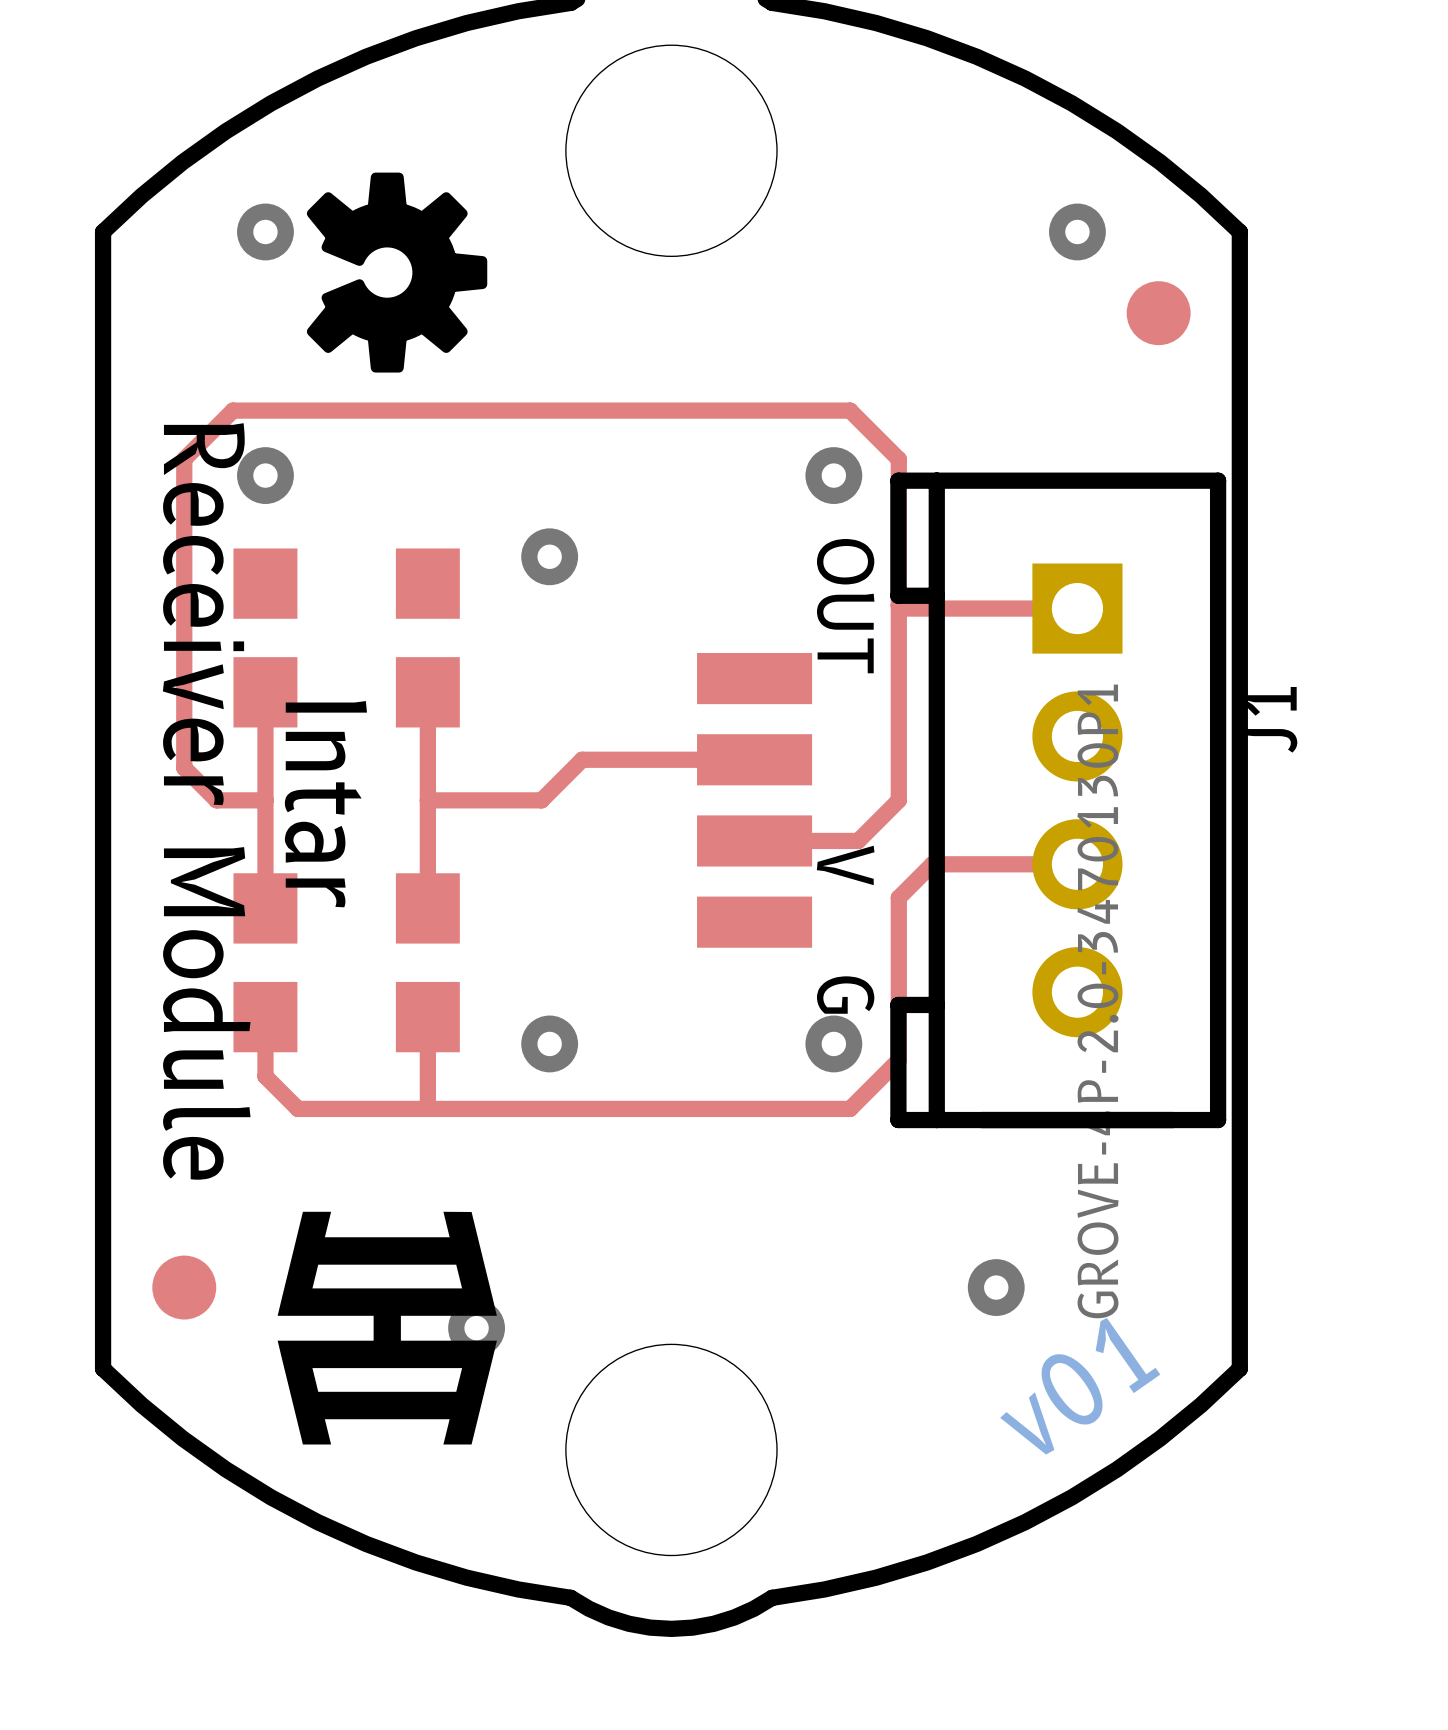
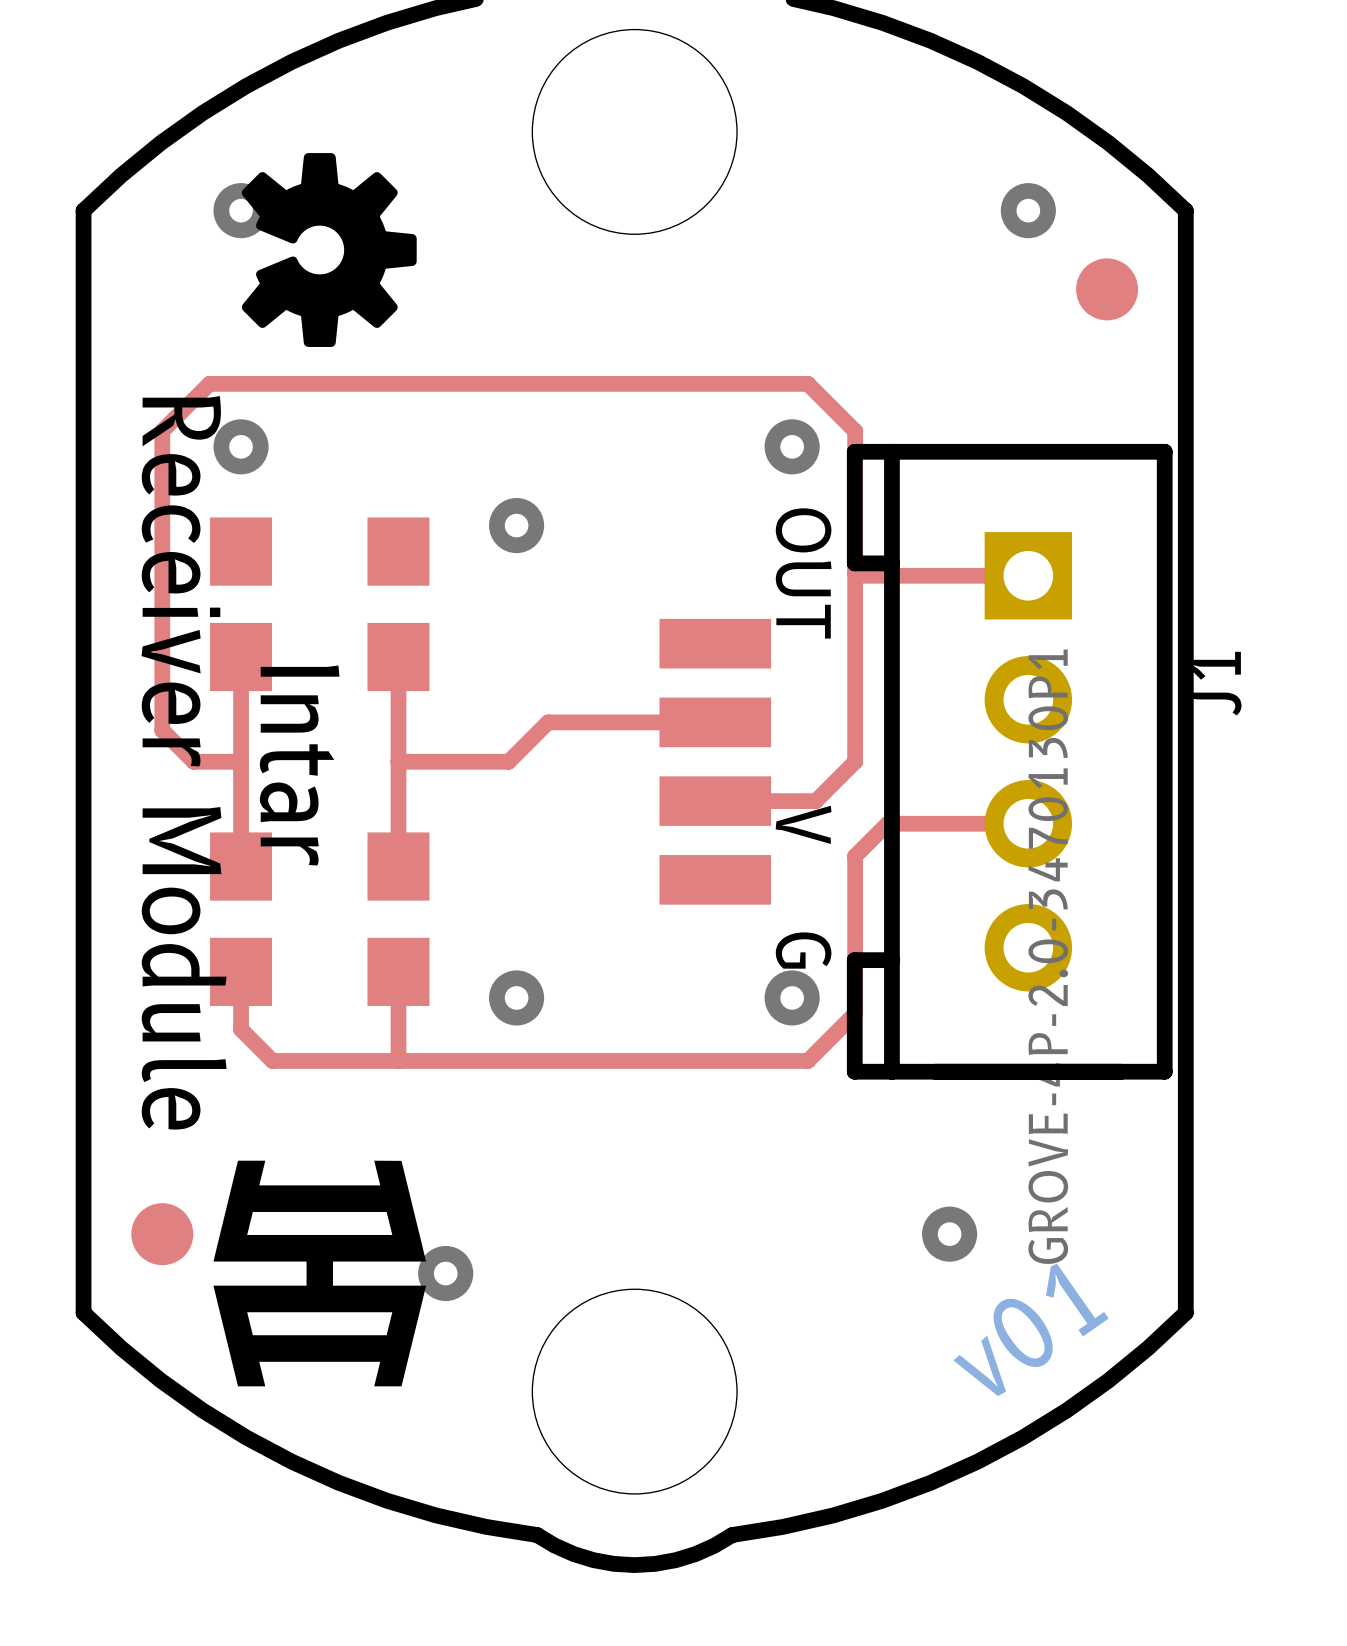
drawing position: (397, 272) -> (329, 250)
drawing position: (387, 1328) -> (319, 1273)

